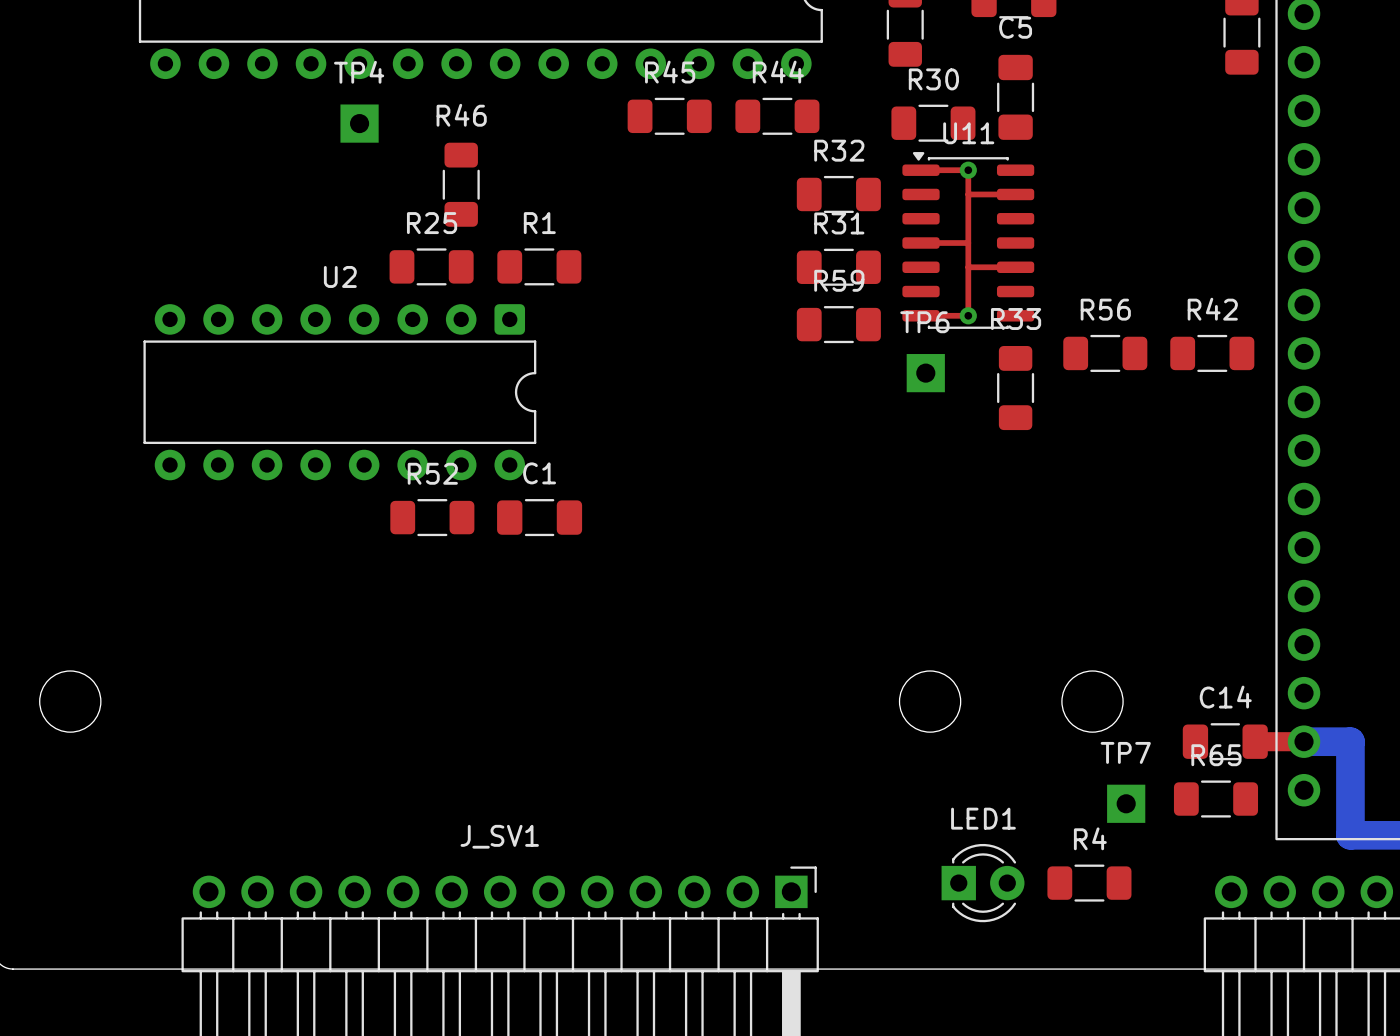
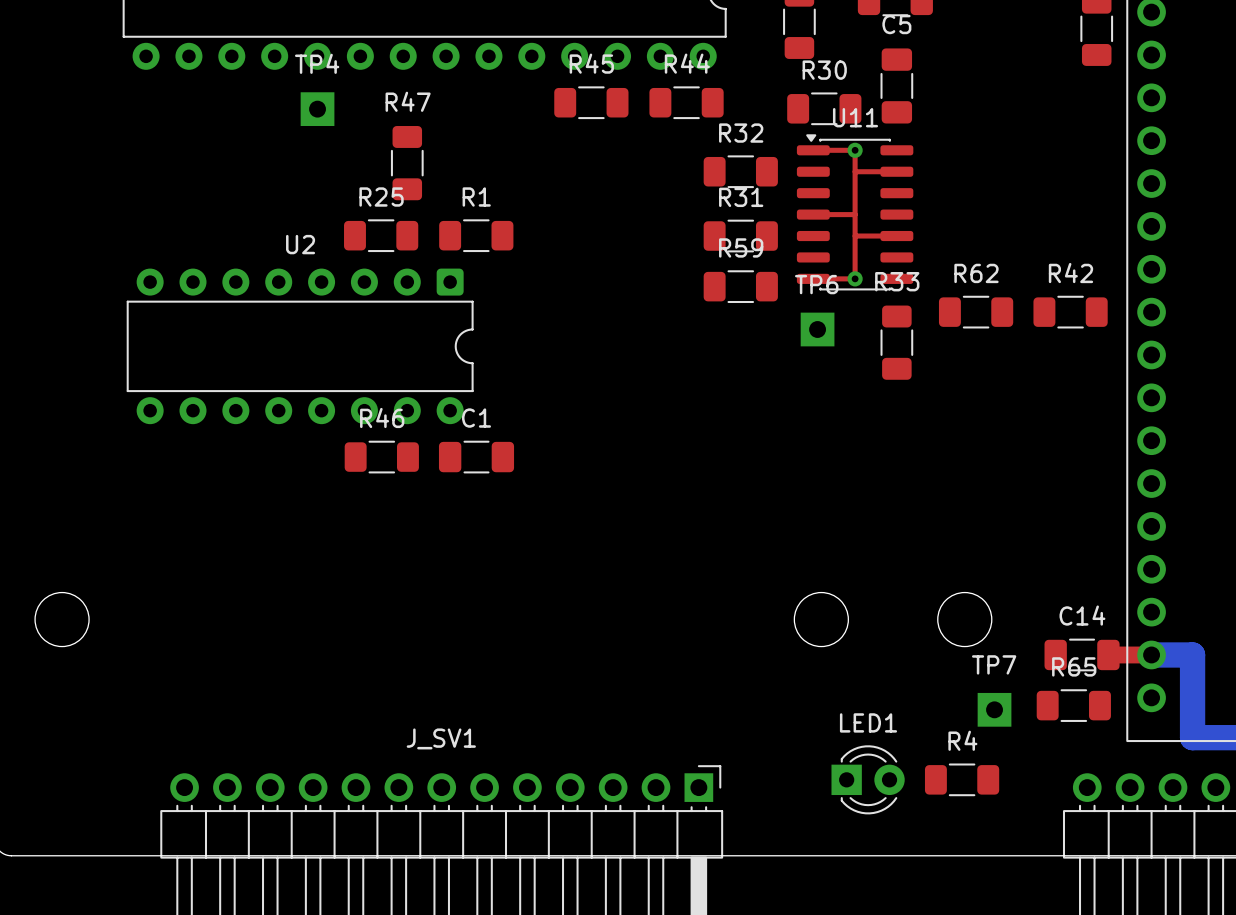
R46 name: R46 (461, 115) -> R47 (408, 101)
R56 name: R56 (1105, 309) -> R62 (976, 273)
R52 name: R52 (432, 473) -> R46 (382, 417)

